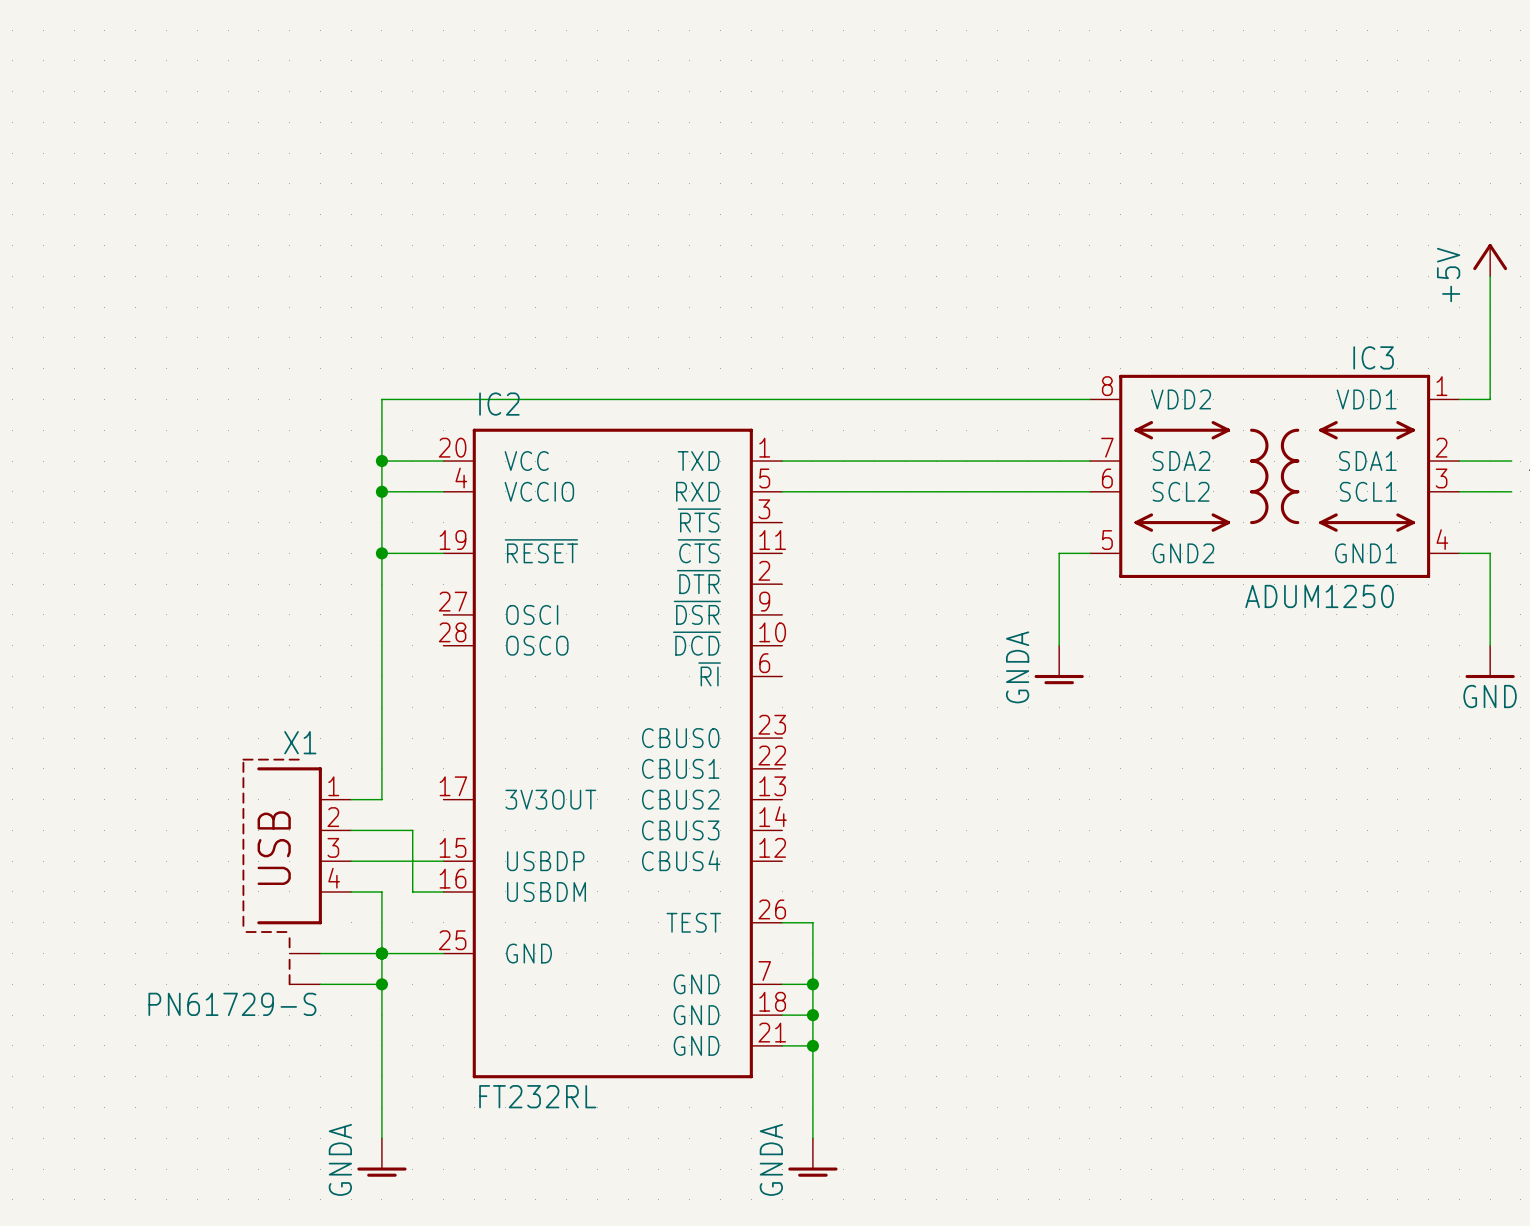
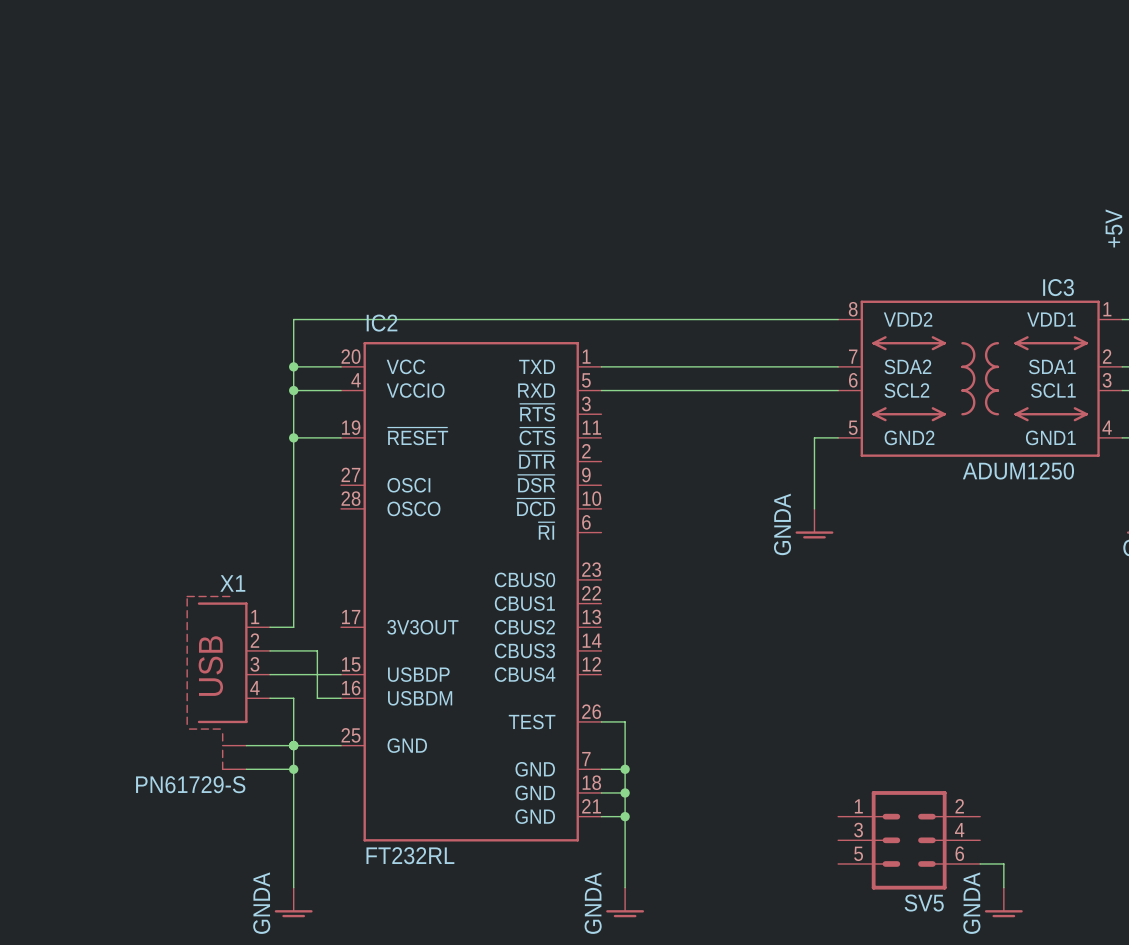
SV5: none -> (909, 840)
wire: none -> (980, 863) (1003, 863) (1003, 887)
power symbol: none -> GNDA (1003, 902)

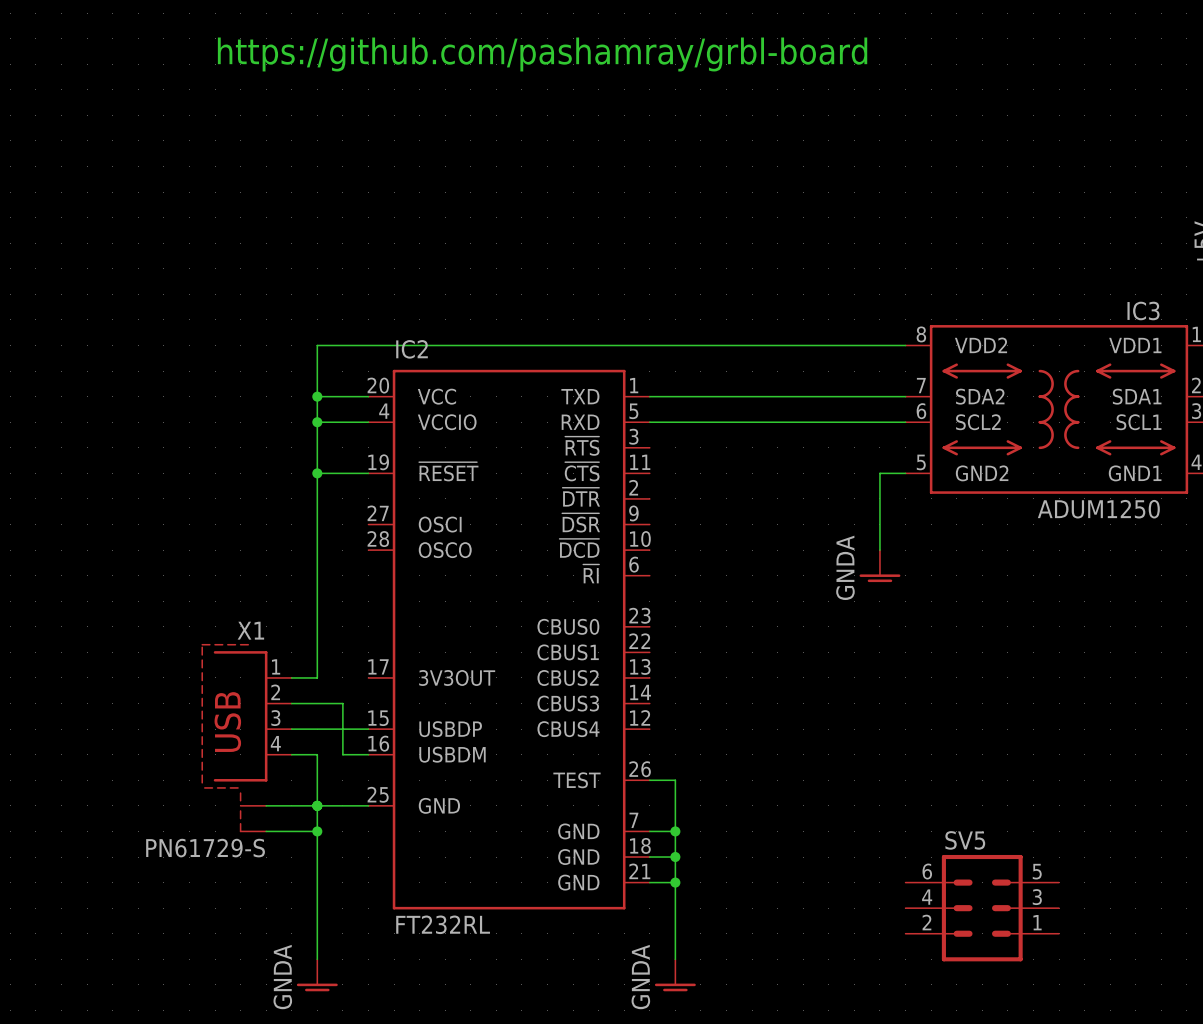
text: none -> https://github.com/pashamray/grbl-board (542, 54)
SV5 rotation: 0° (909, 840) -> 180° (982, 908)
wire: (980, 863) (1003, 863) (1003, 887) -> none
power symbol: GNDA (1003, 902) -> none

